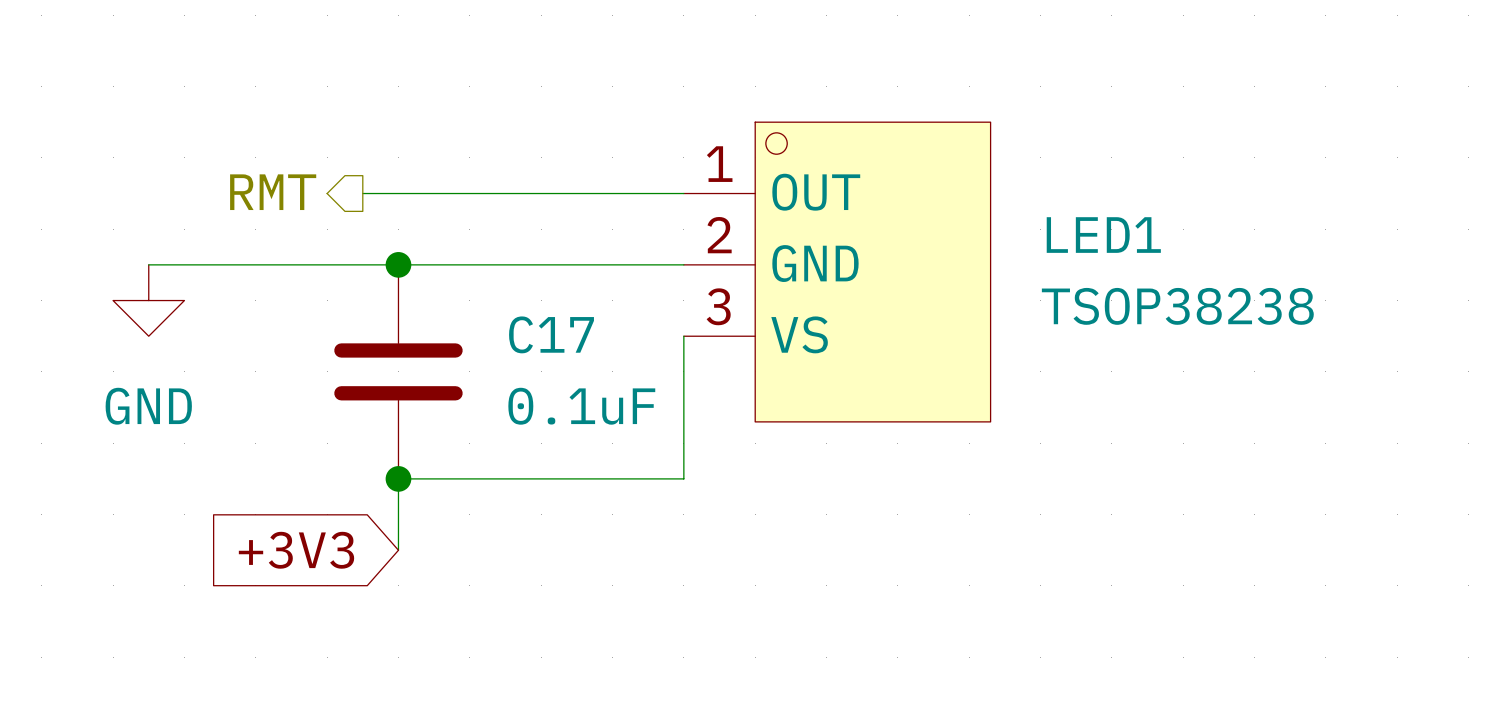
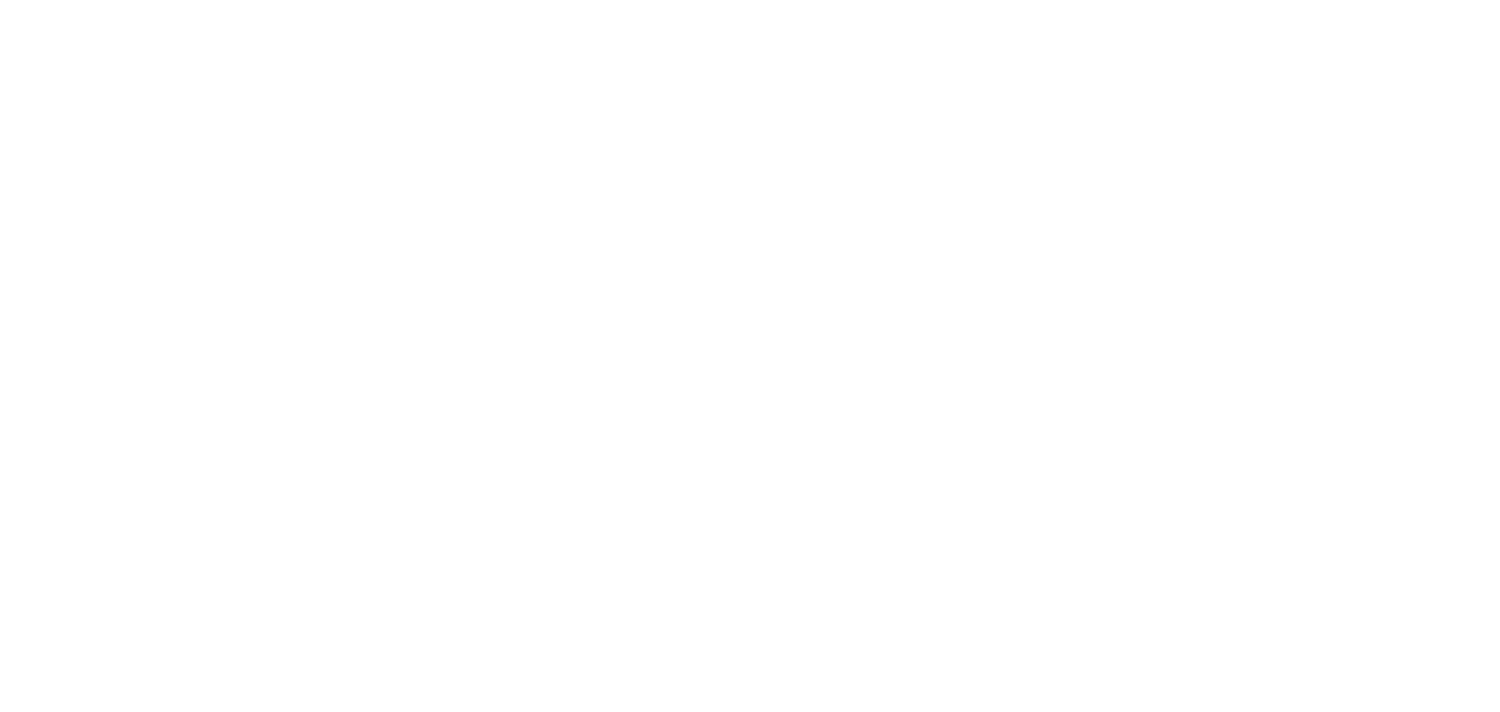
hierarchical label: RMT (273, 192) -> none
wire: (362, 193) (683, 193) -> none
wire: (148, 264) (683, 264) -> none
junction: (398, 264) -> none
LED1: TSOP38238 (837, 272) -> none
power symbol: GND (148, 300) -> none
wire: (683, 336) (683, 478) (398, 478) (398, 550) -> none
C17: 0.1uF (398, 371) -> none
junction: (398, 478) -> none
global label: +3V3 (296, 550) -> none

